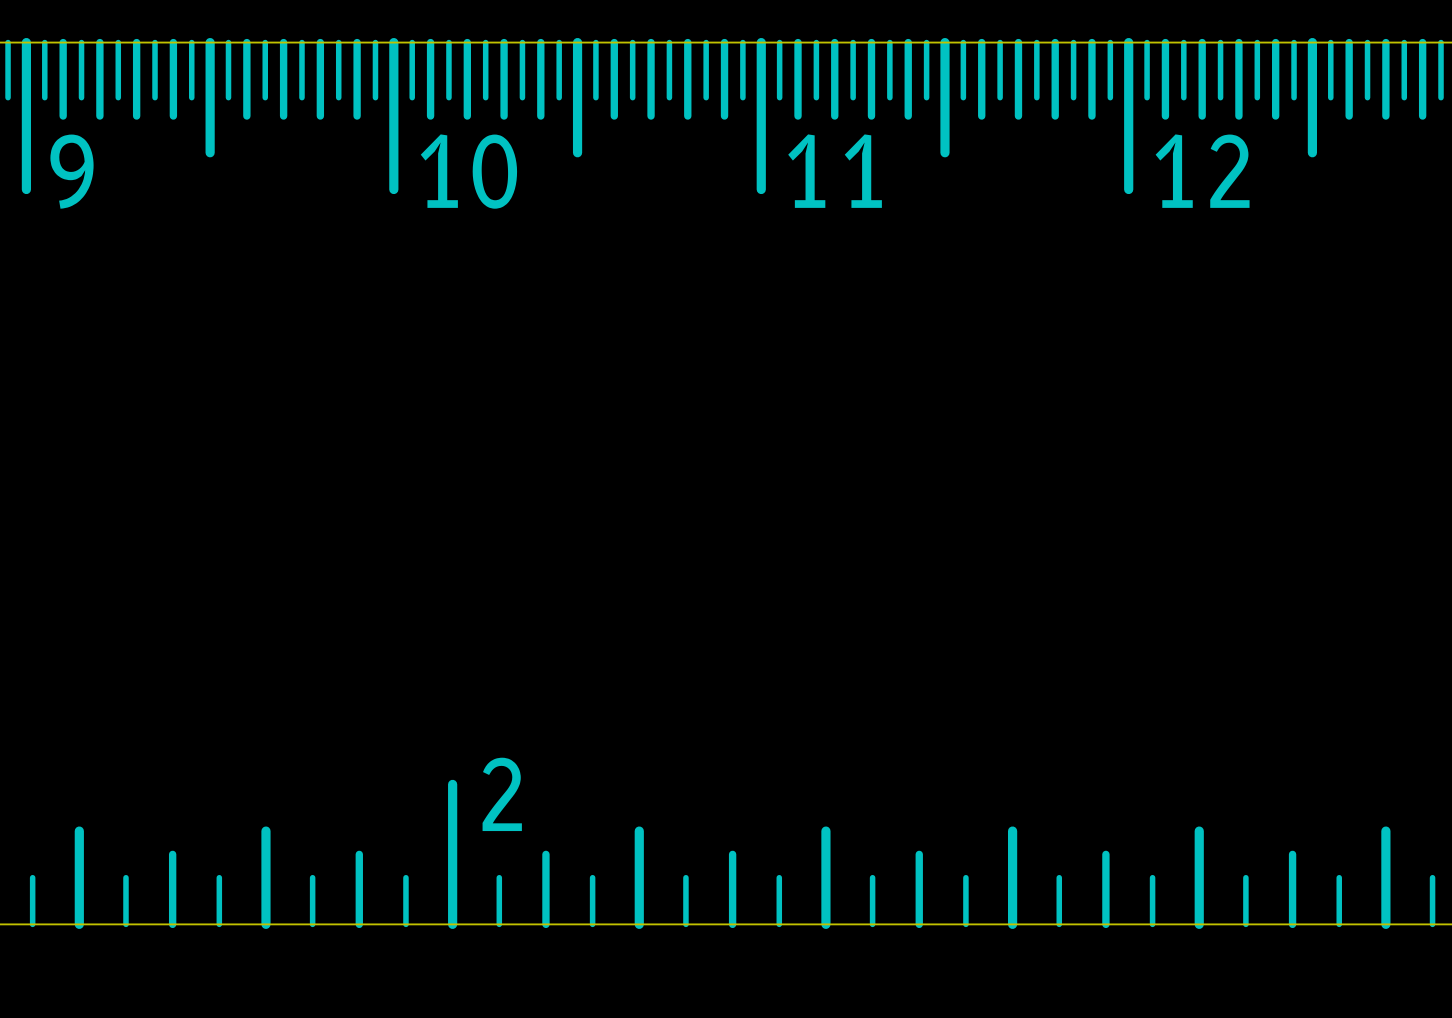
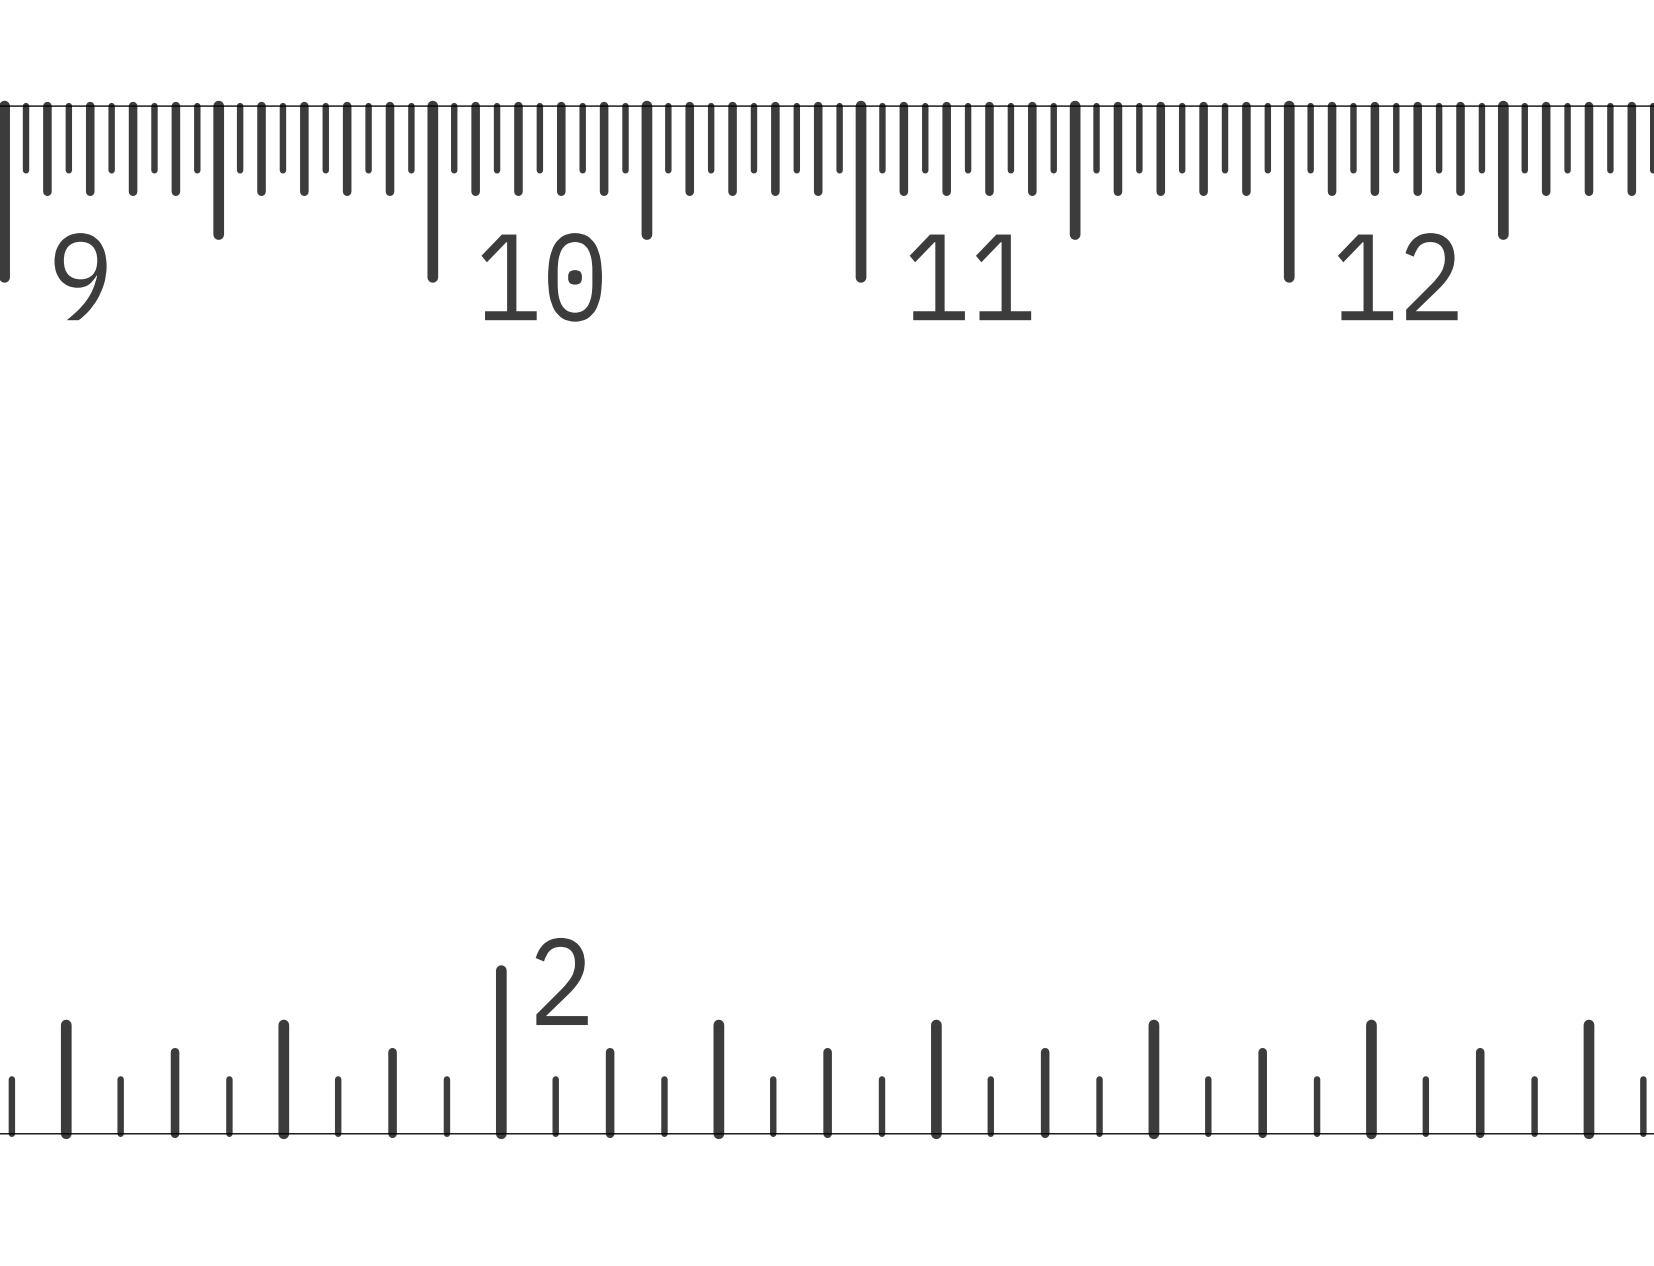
text position: 9 (72, 171) -> 9 (80, 276)
text position: 10 (468, 171) -> 10 (541, 277)
text position: 11 (835, 171) -> 11 (970, 277)
text position: 12 (1202, 171) -> 12 (1397, 276)

